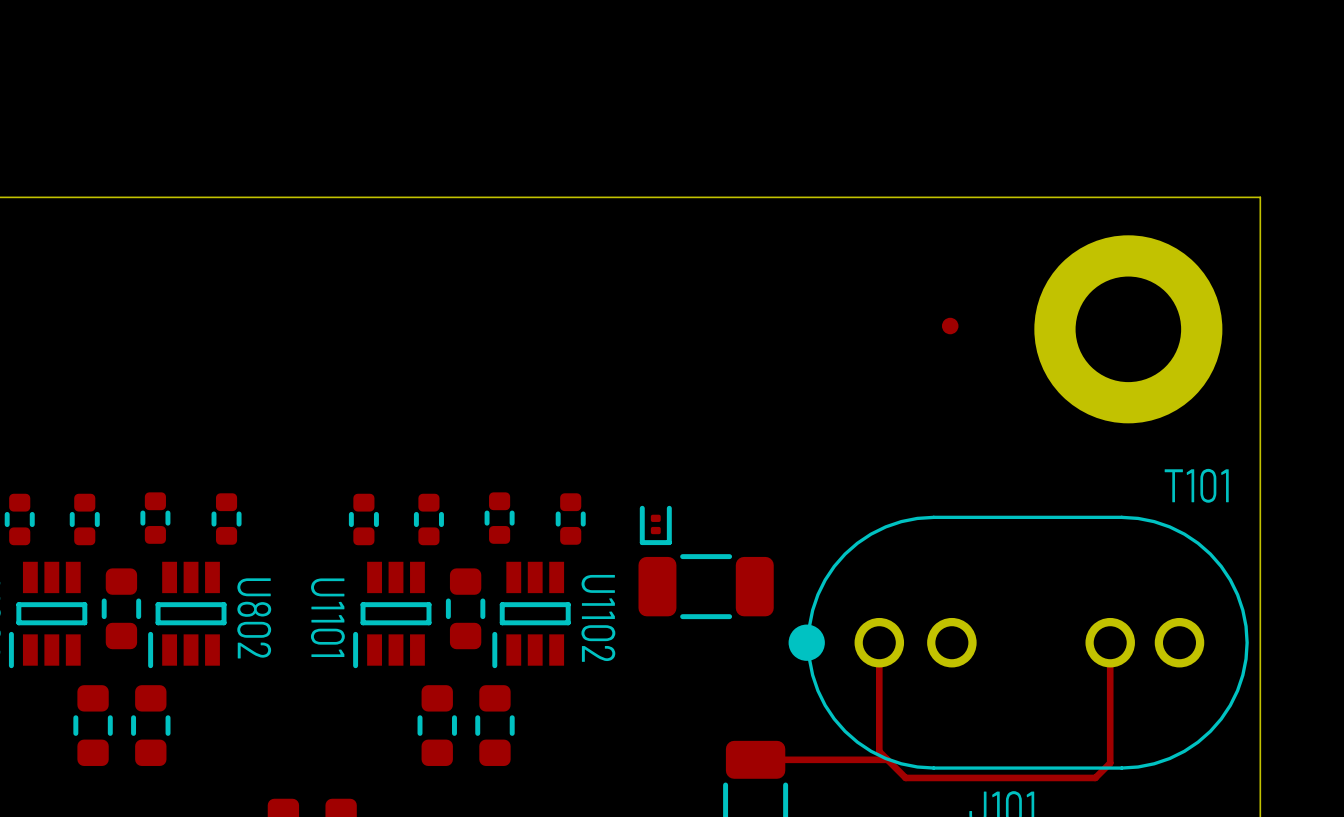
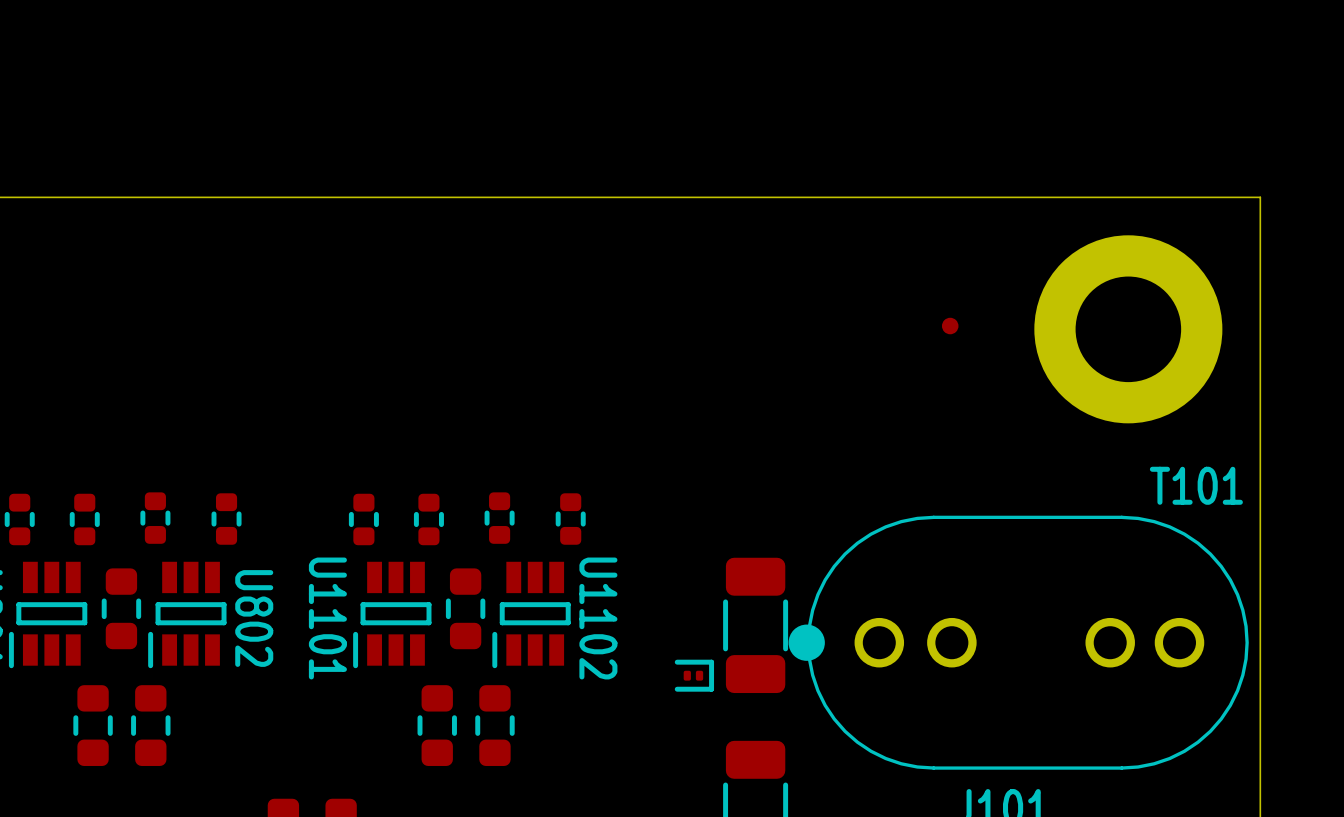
part rotation: 0° (655, 525) -> 90° counterclockwise (694, 675)
part position: (655, 525) -> (694, 675)
part rotation: 0° (706, 586) -> 90° clockwise (755, 625)
top track: (879, 642) (879, 751) (905, 777) (1095, 777) (1110, 763) (1110, 642) -> none
top track: (755, 759) (887, 759) -> none

